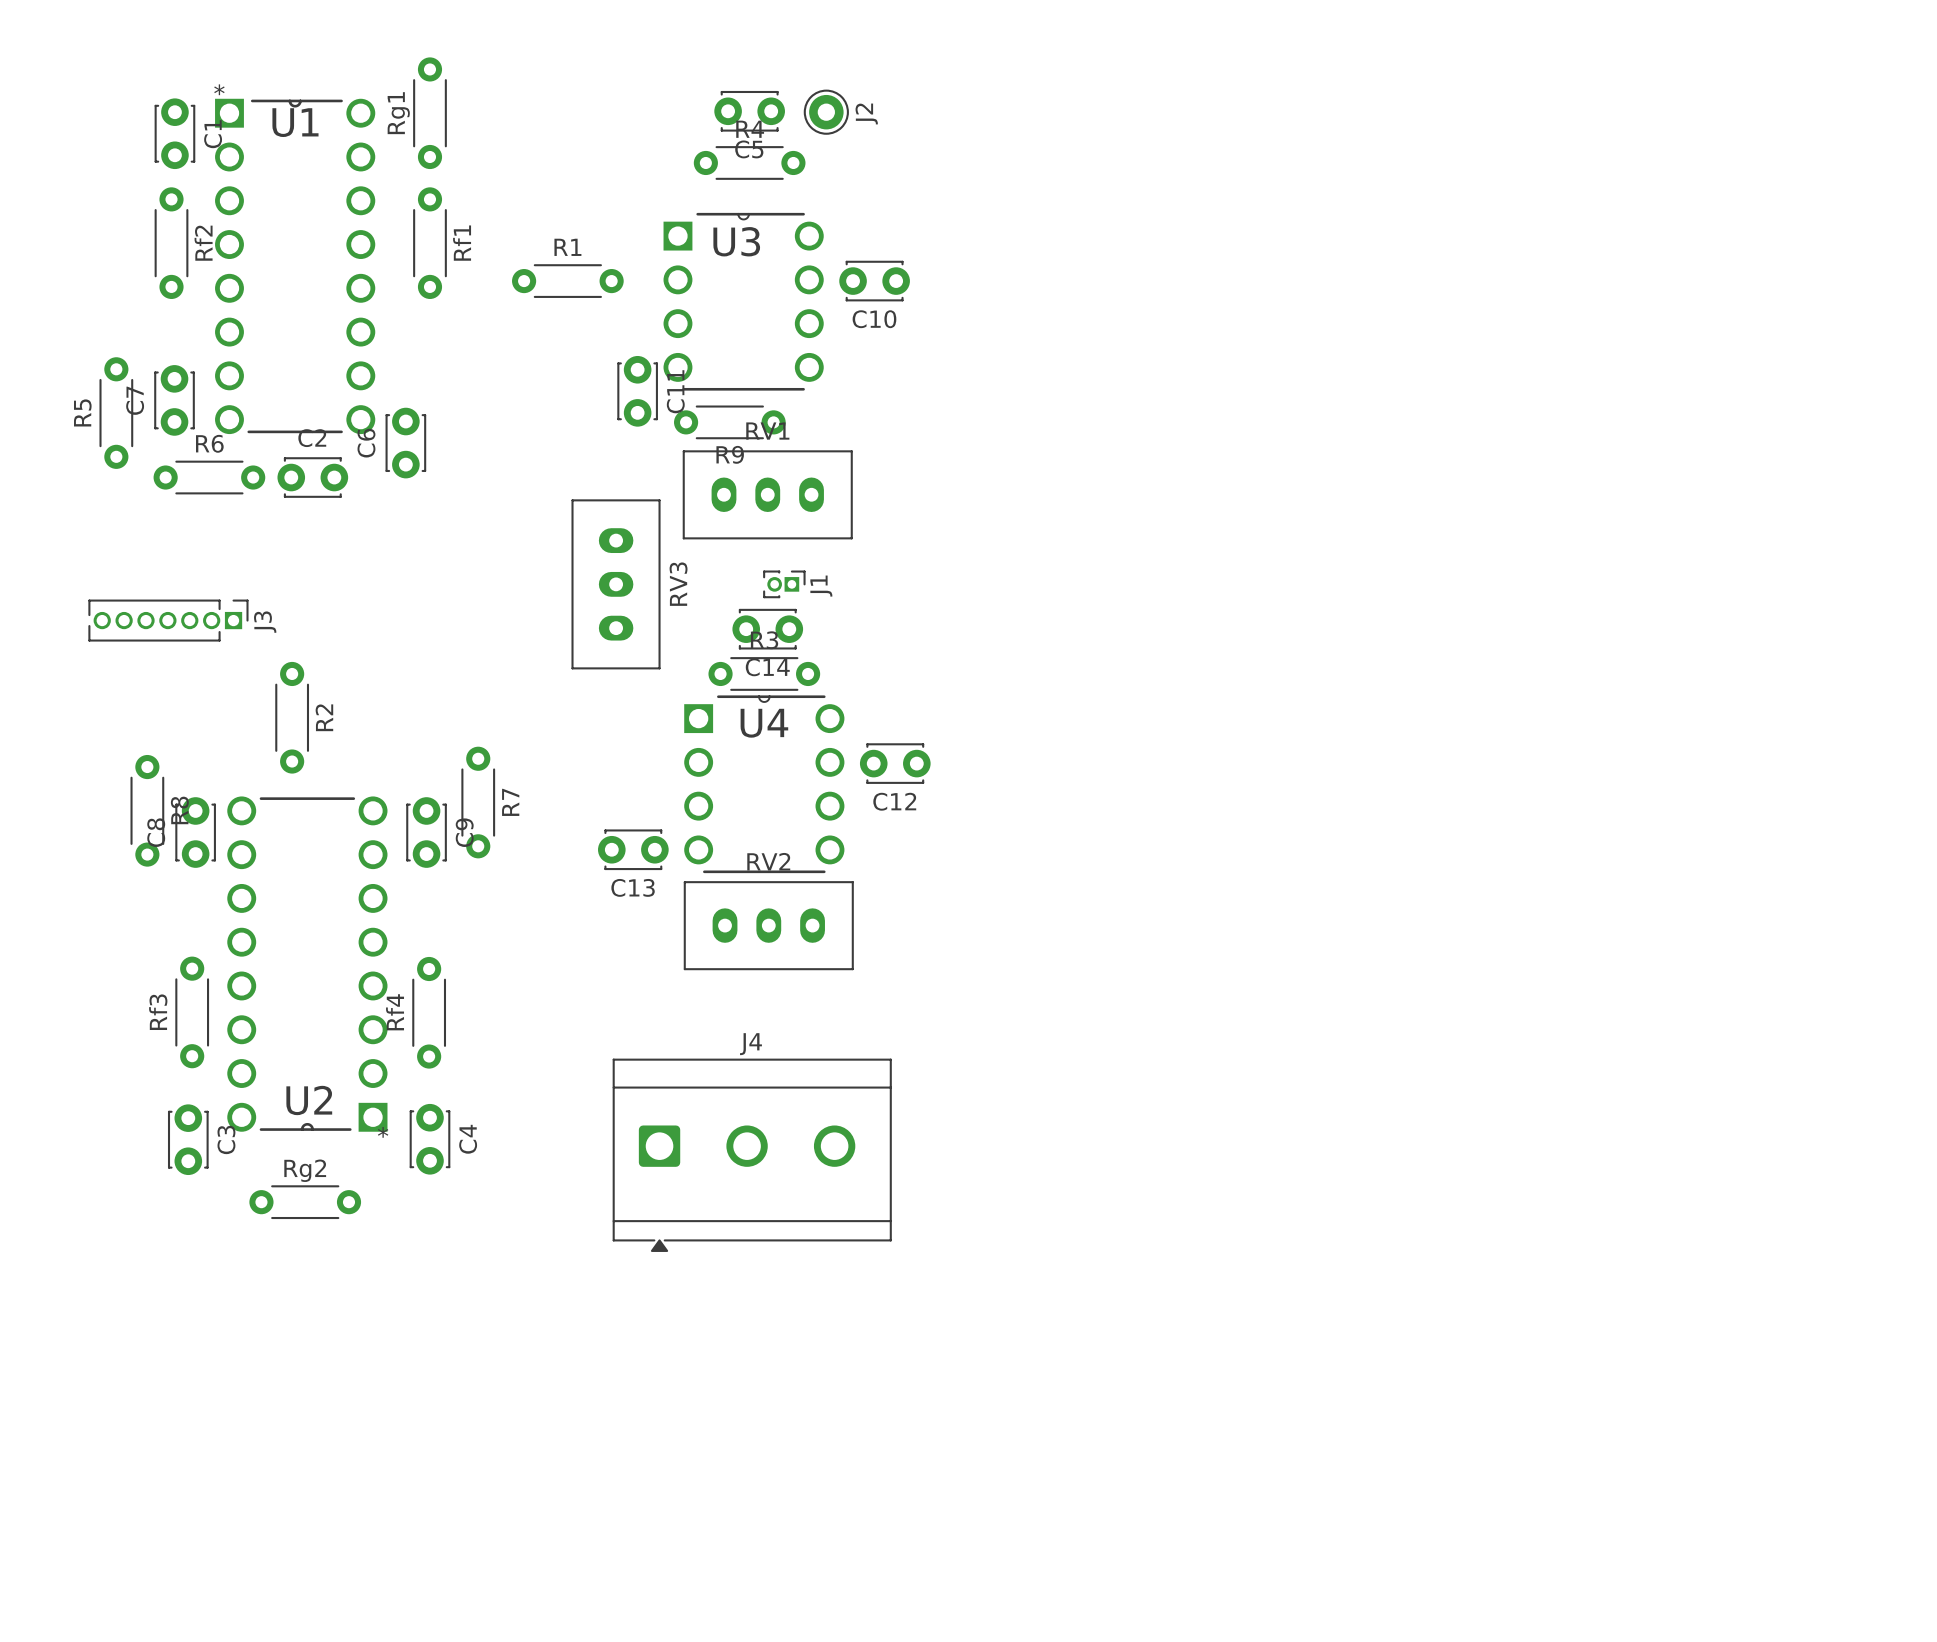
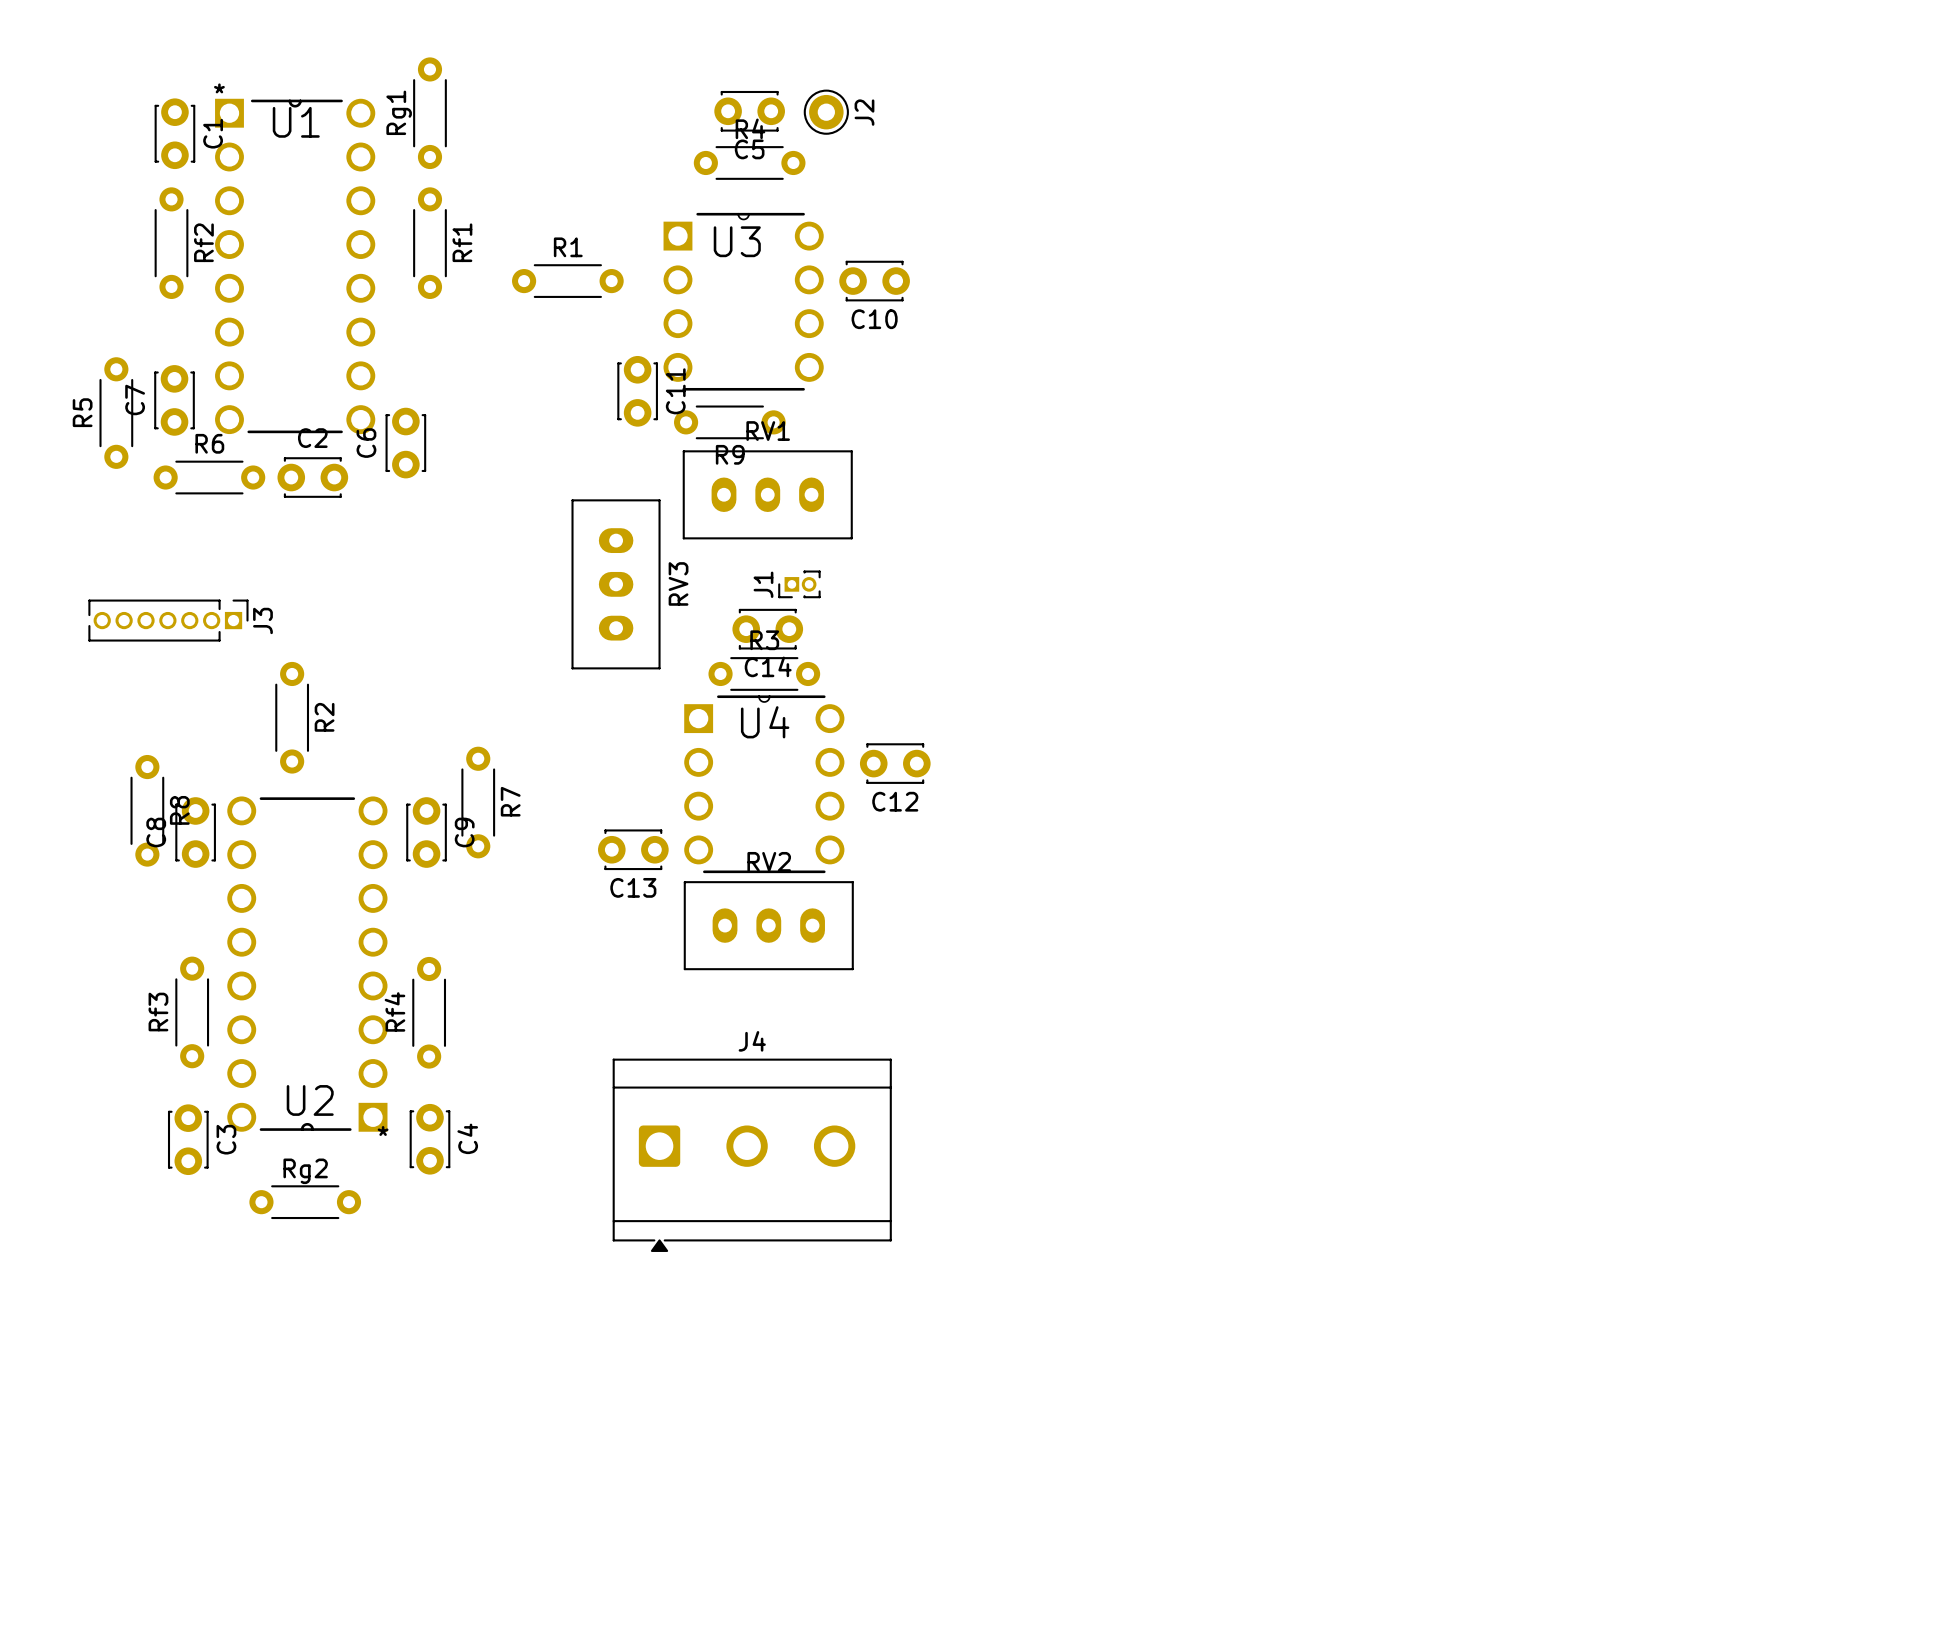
J1 rotation: 0° (784, 584) -> 180° (799, 584)

